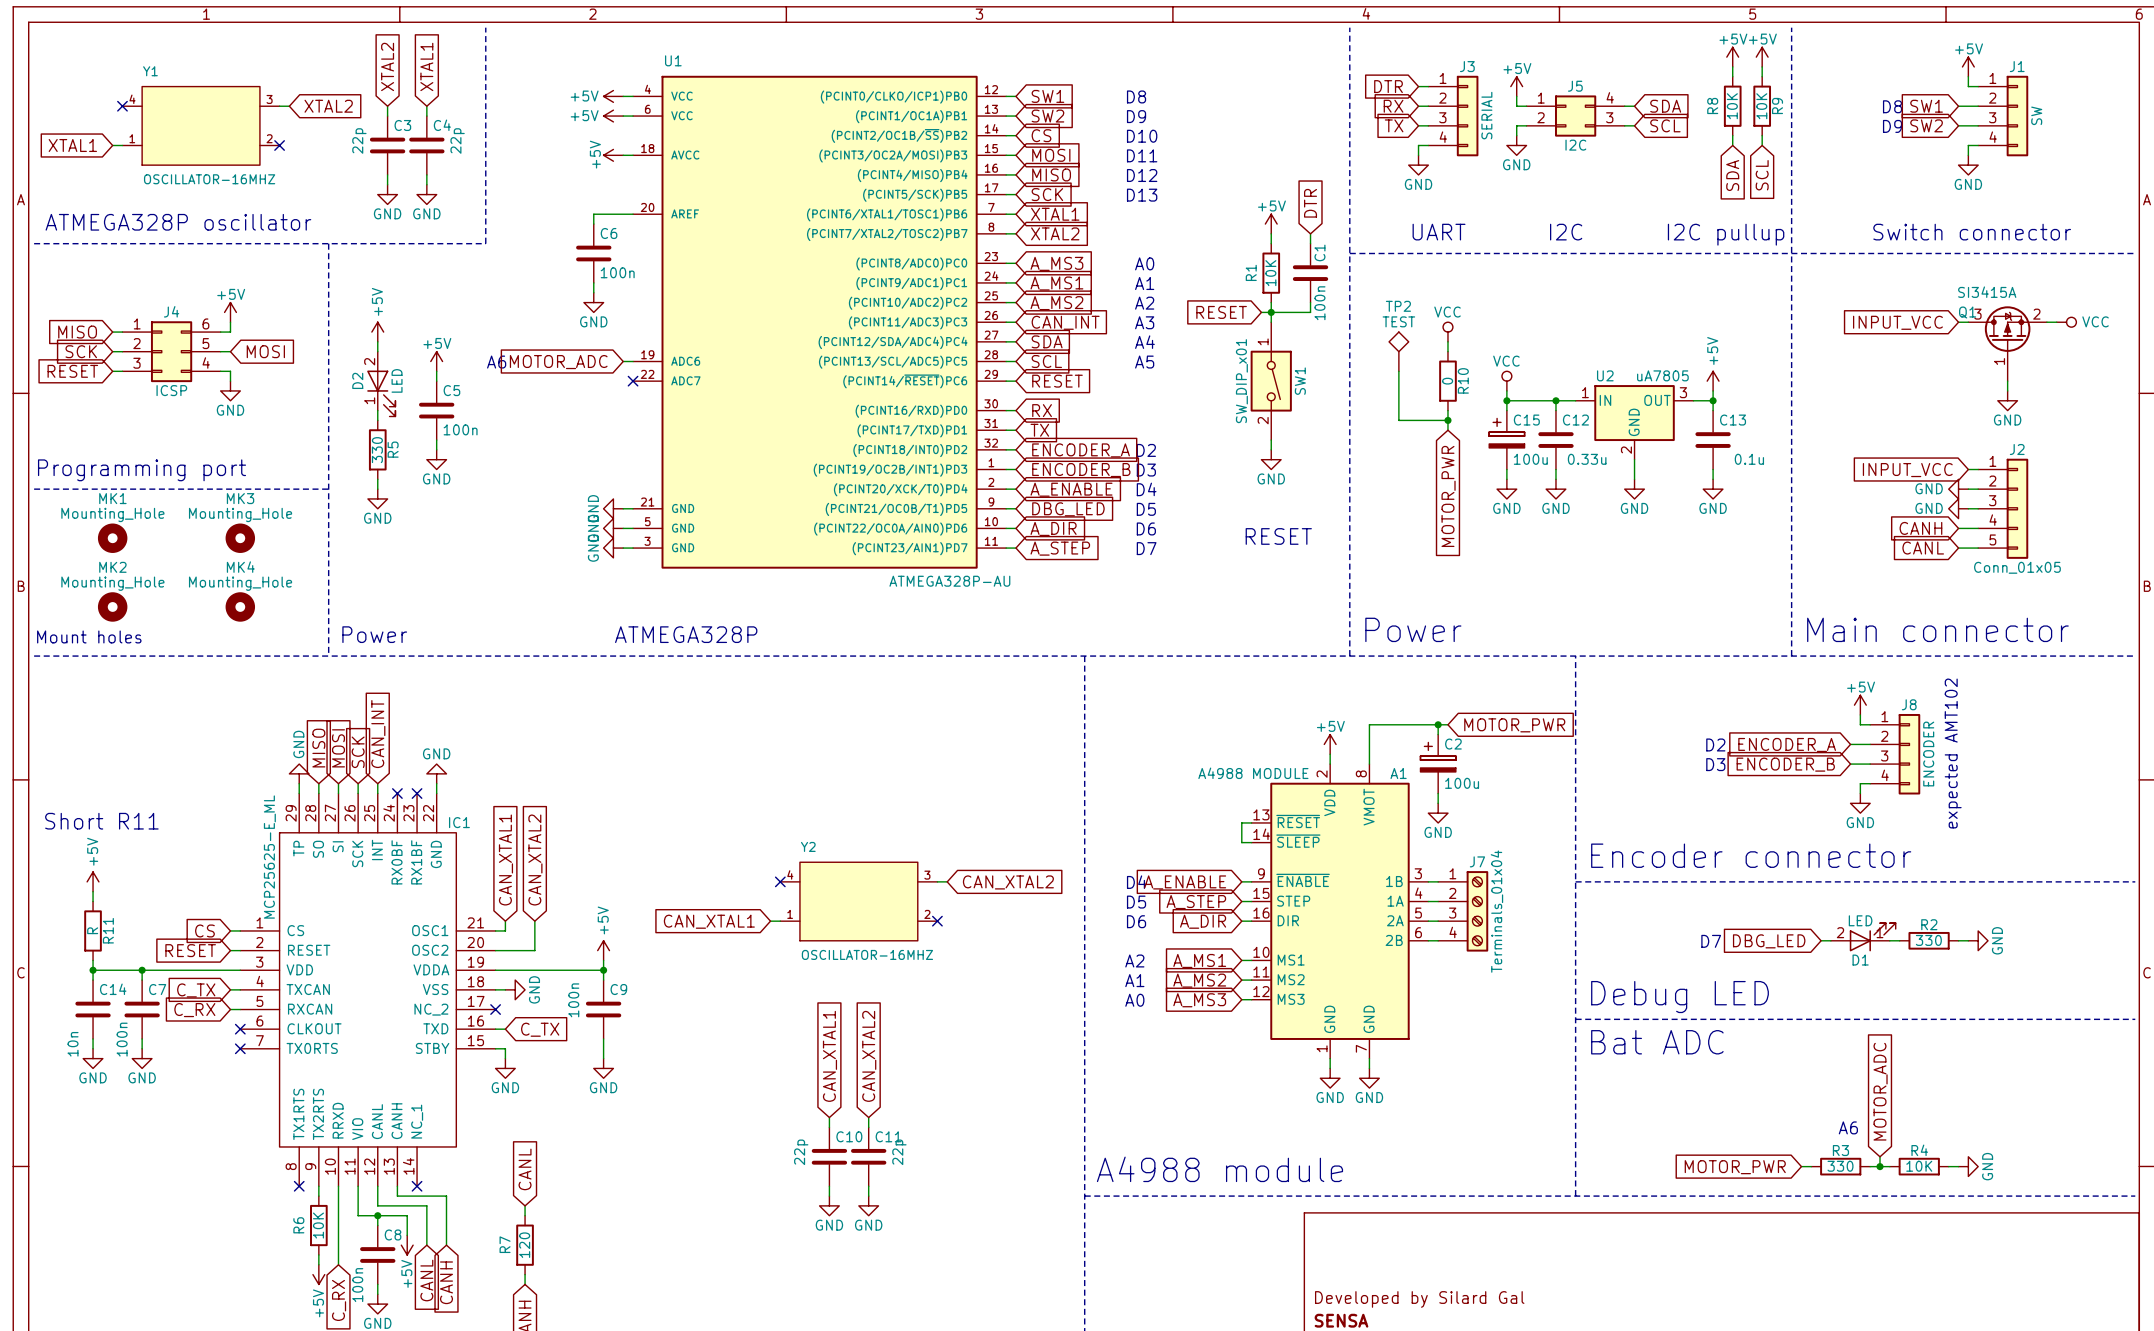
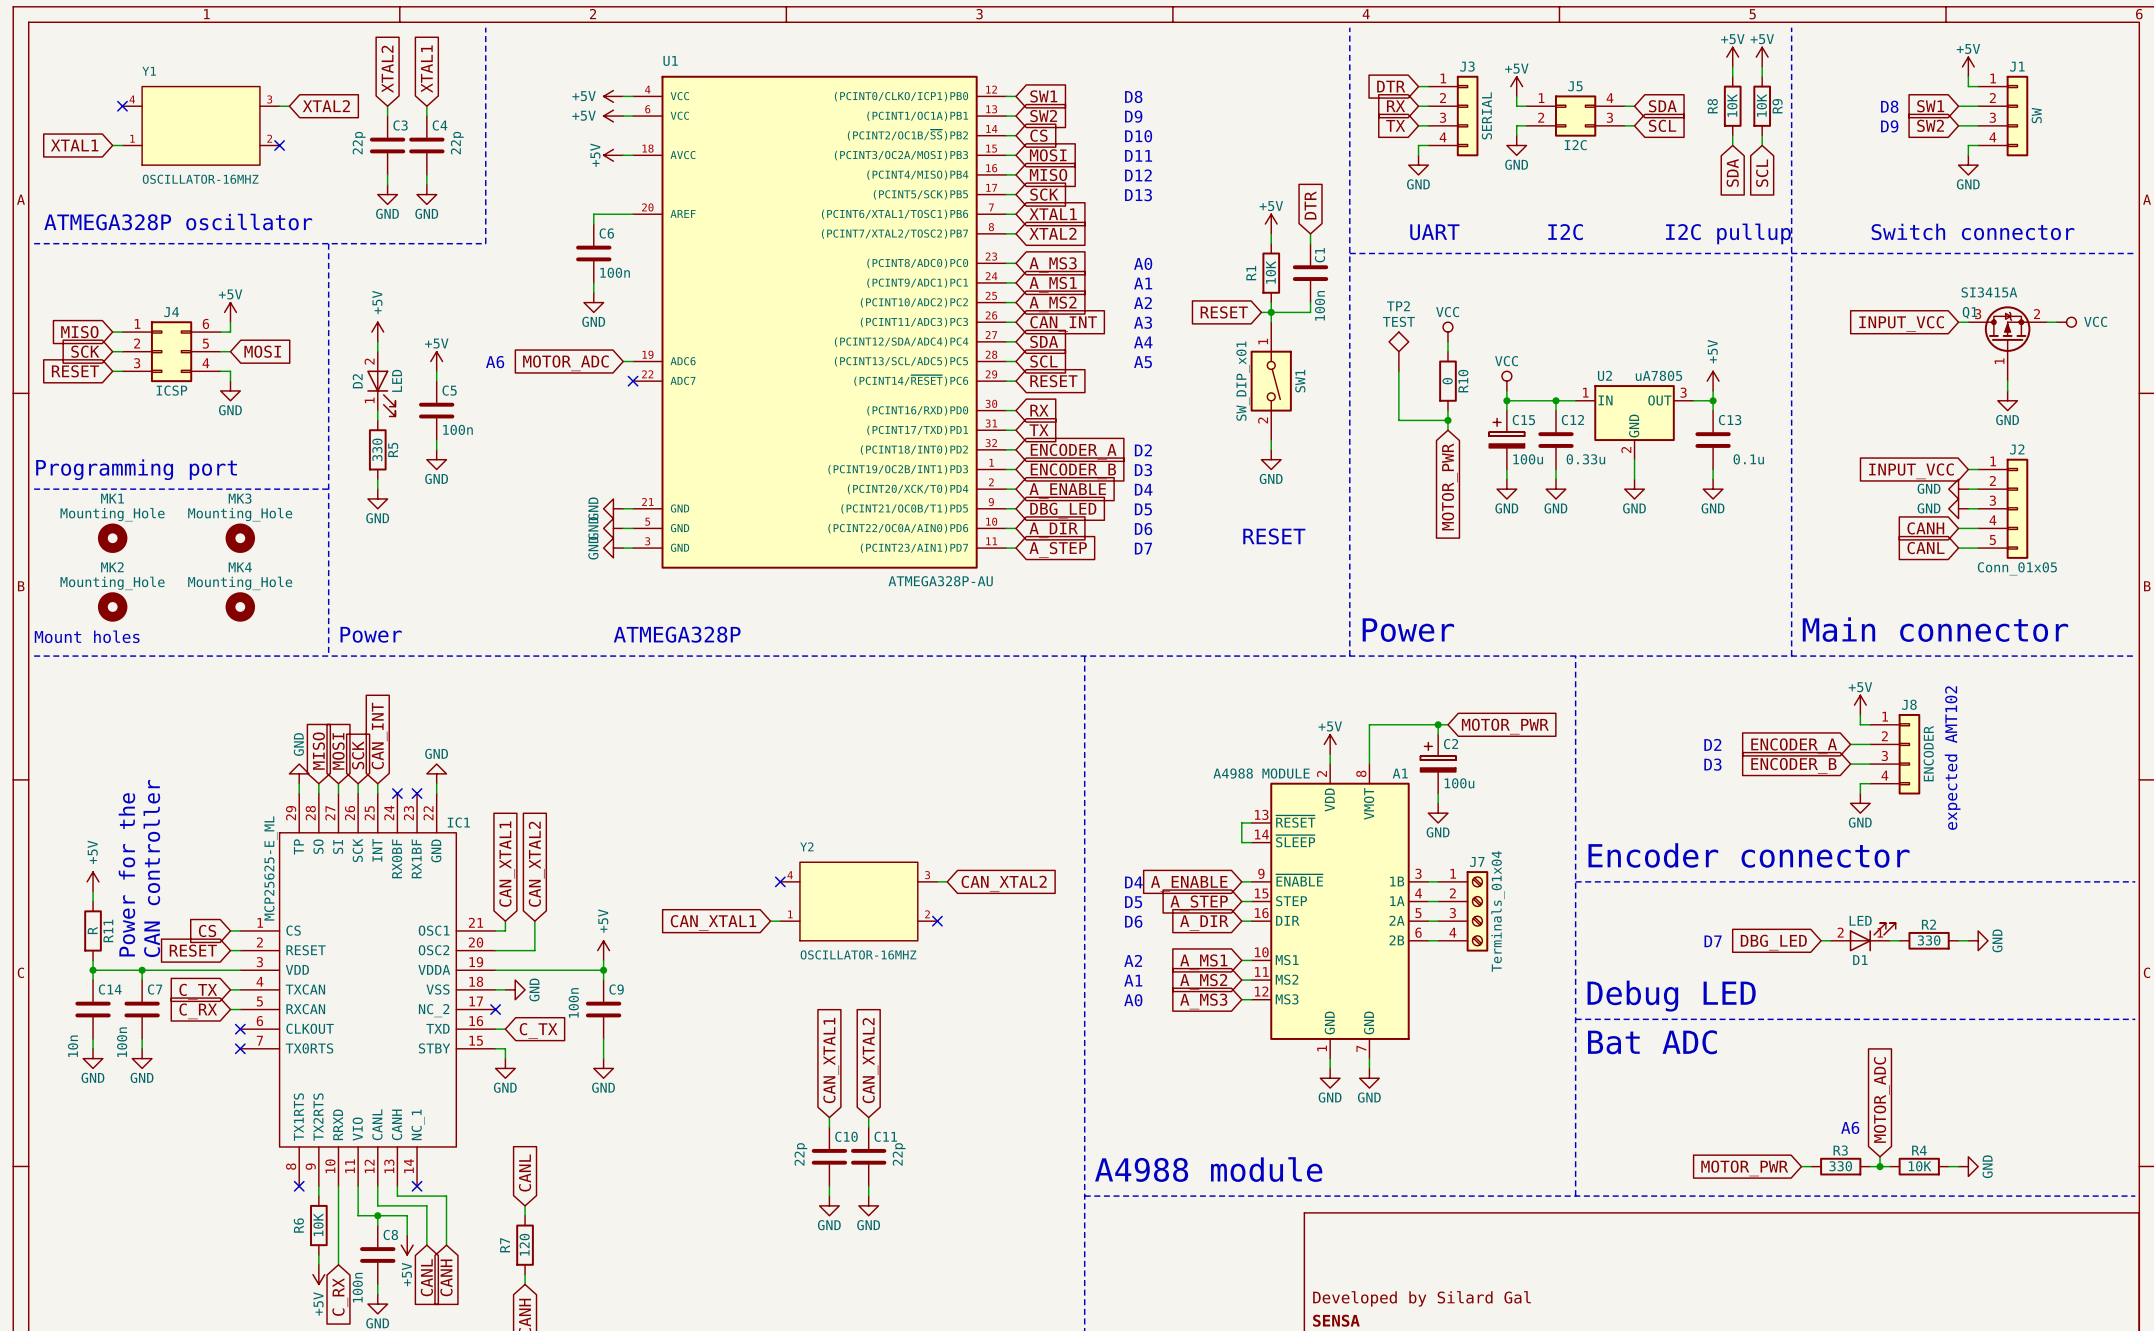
text: Short R11 (101, 821) -> none
text: none -> CAN controller (151, 868)
text: none -> Power for the (126, 874)

